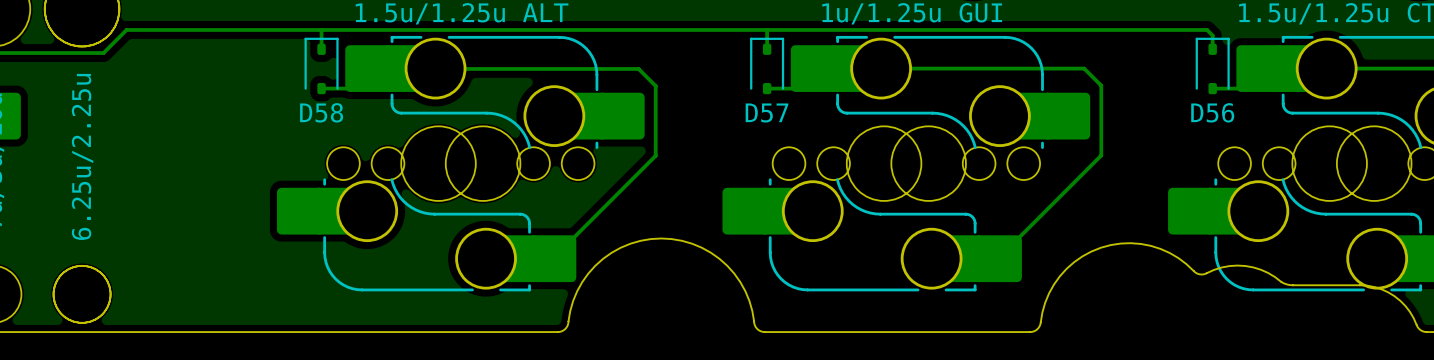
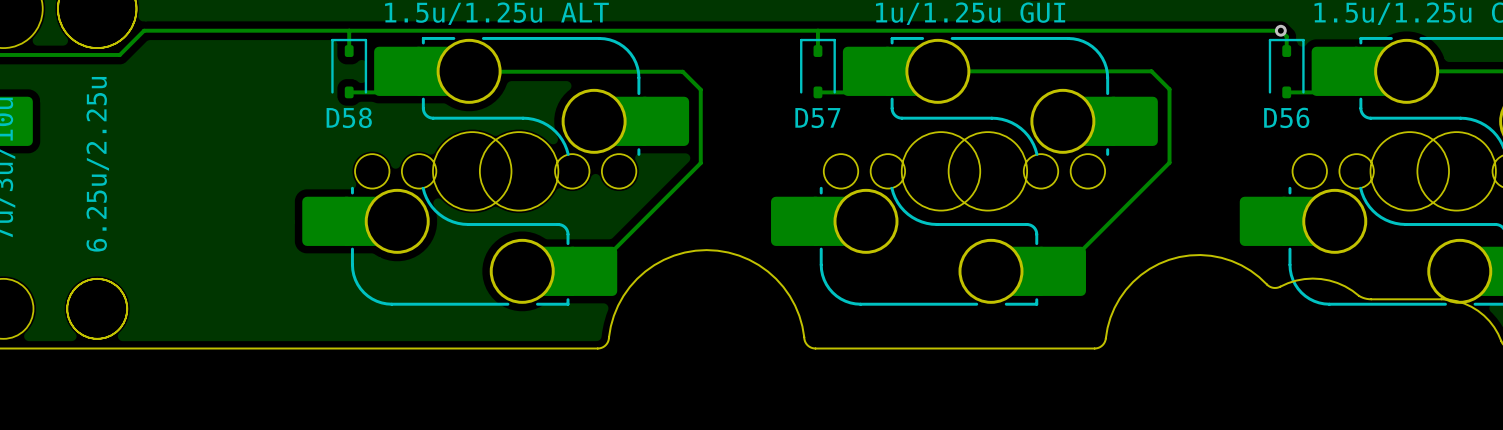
via: none -> (1280, 30)

